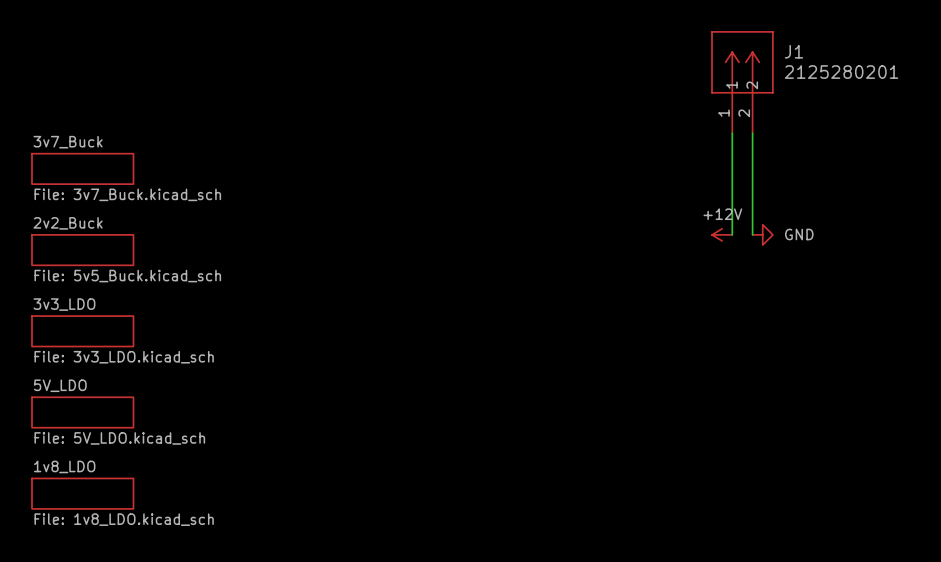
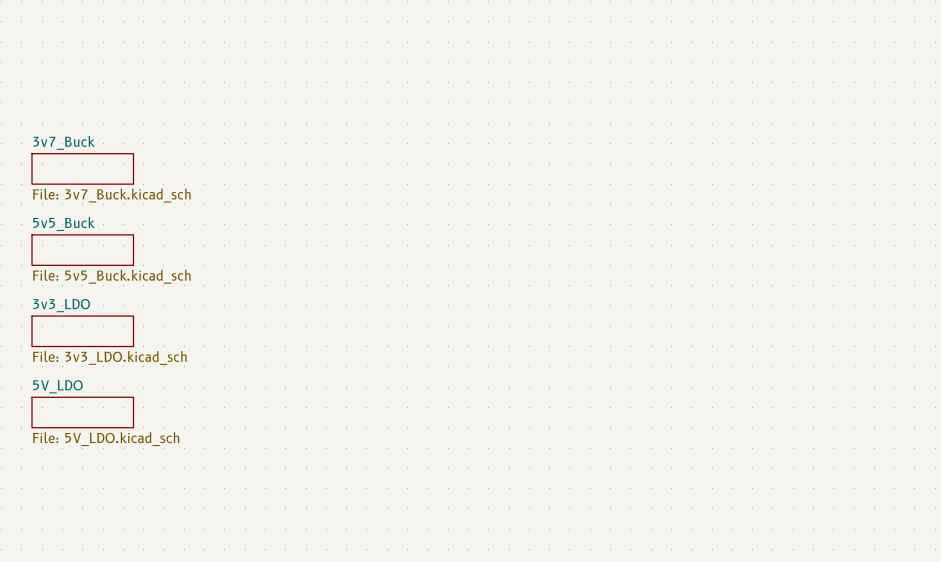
J1: 2125280201 (742, 82) -> none
wire: (732, 133) (732, 234) -> none
wire: (752, 133) (752, 234) -> none
sheet 2v2_Buck name: 2v2_Buck (68, 223) -> 5v5_Buck (64, 224)
power symbol: +12V (722, 234) -> none
power symbol: GND (762, 234) -> none
sheet 1v8_LDO: File: 1v8_LDO.kicad_sch (82, 493) -> none

